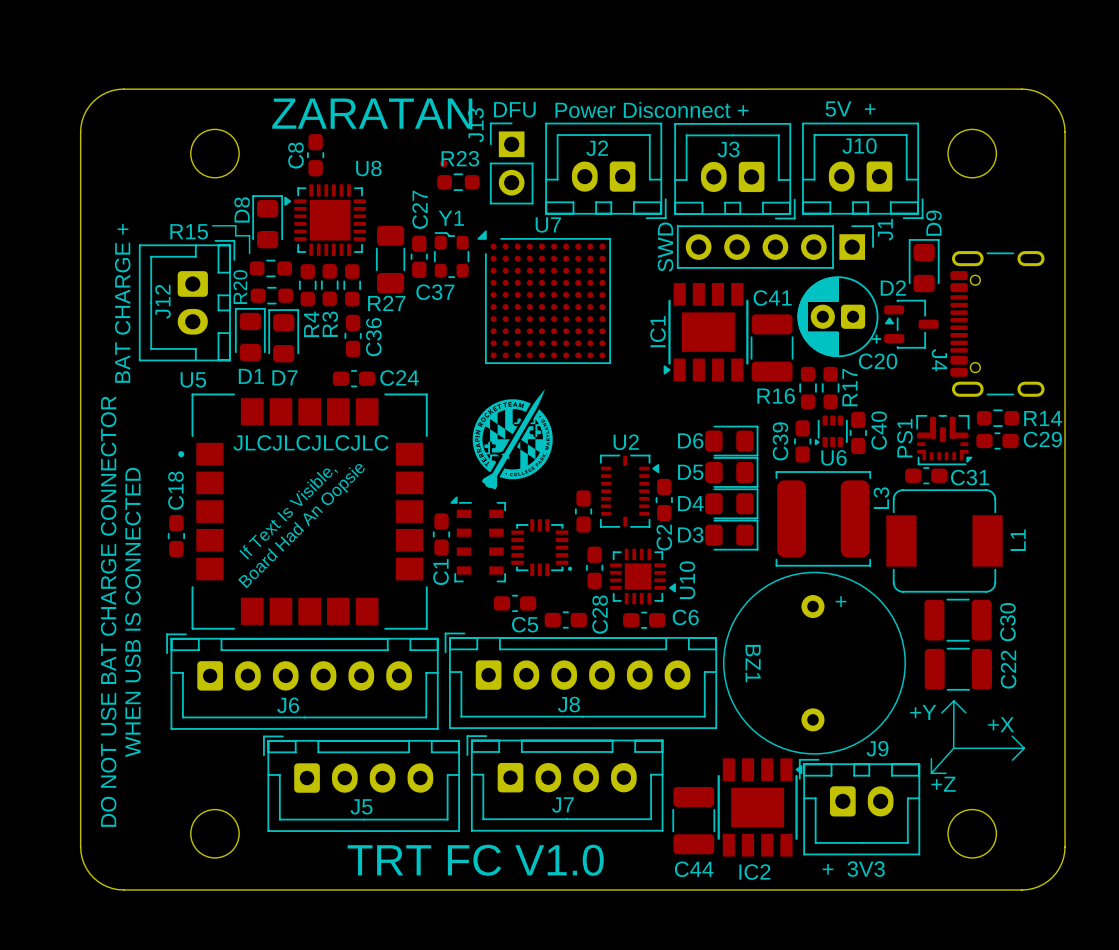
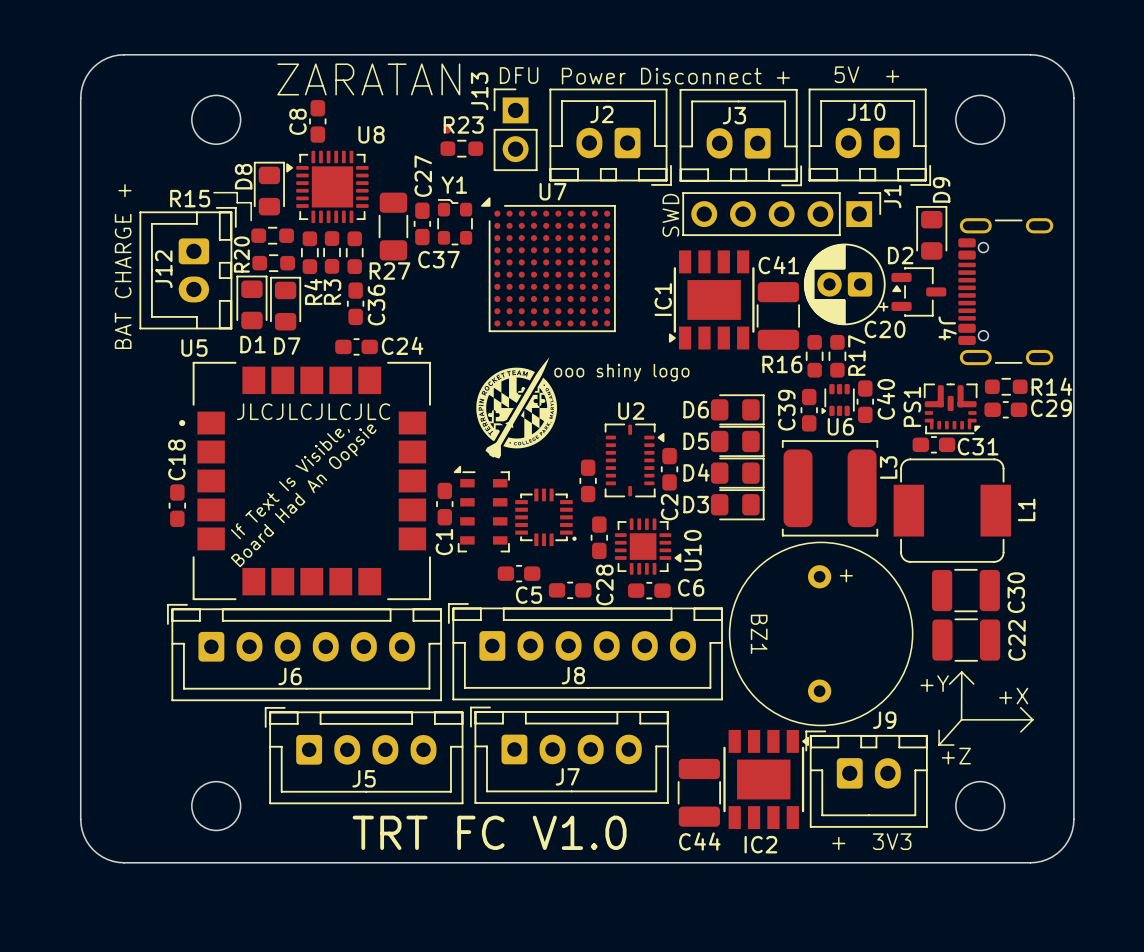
text: none -> ooo shiny logo (621, 372)
text: DO NOT USE BAT CHARGE CONNECTOR (108, 611) -> none
text: WHEN USB IS CONNECTED (132, 612) -> none

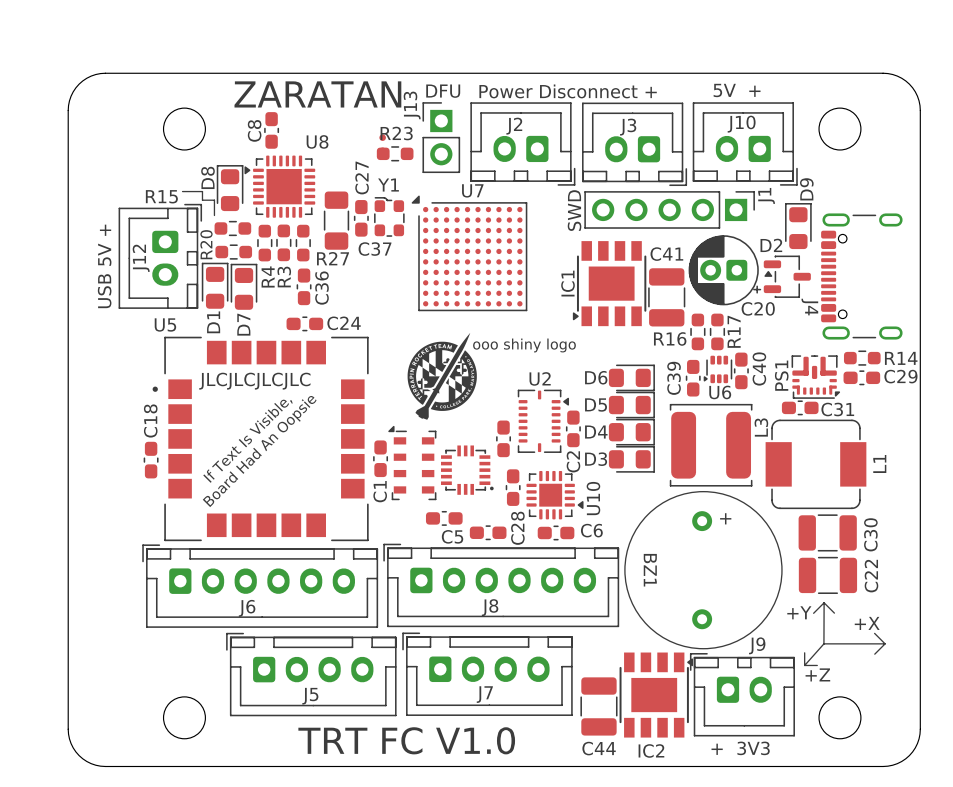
text: BAT CHARGE + (123, 266) -> none
text: none -> USB 5V + (104, 266)
D1 name rotation: 0° (253, 344) -> 90° counterclockwise (213, 322)
D7 name rotation: 0° (287, 346) -> 90° counterclockwise (243, 324)

